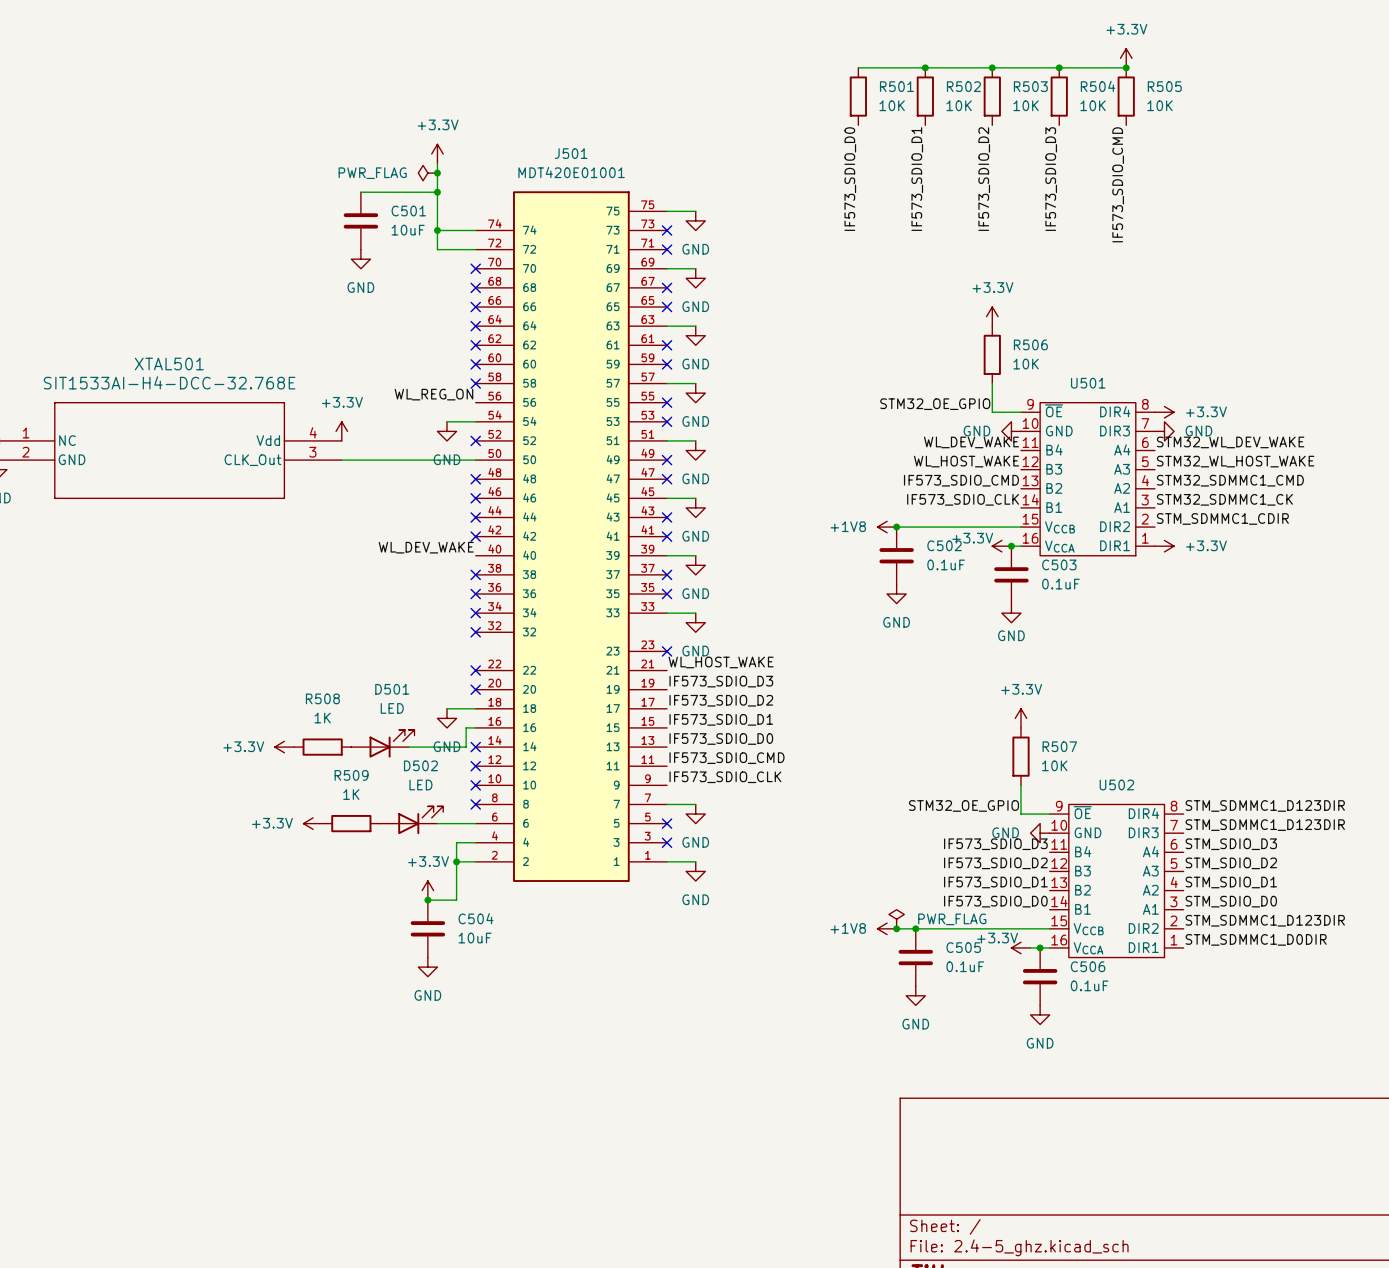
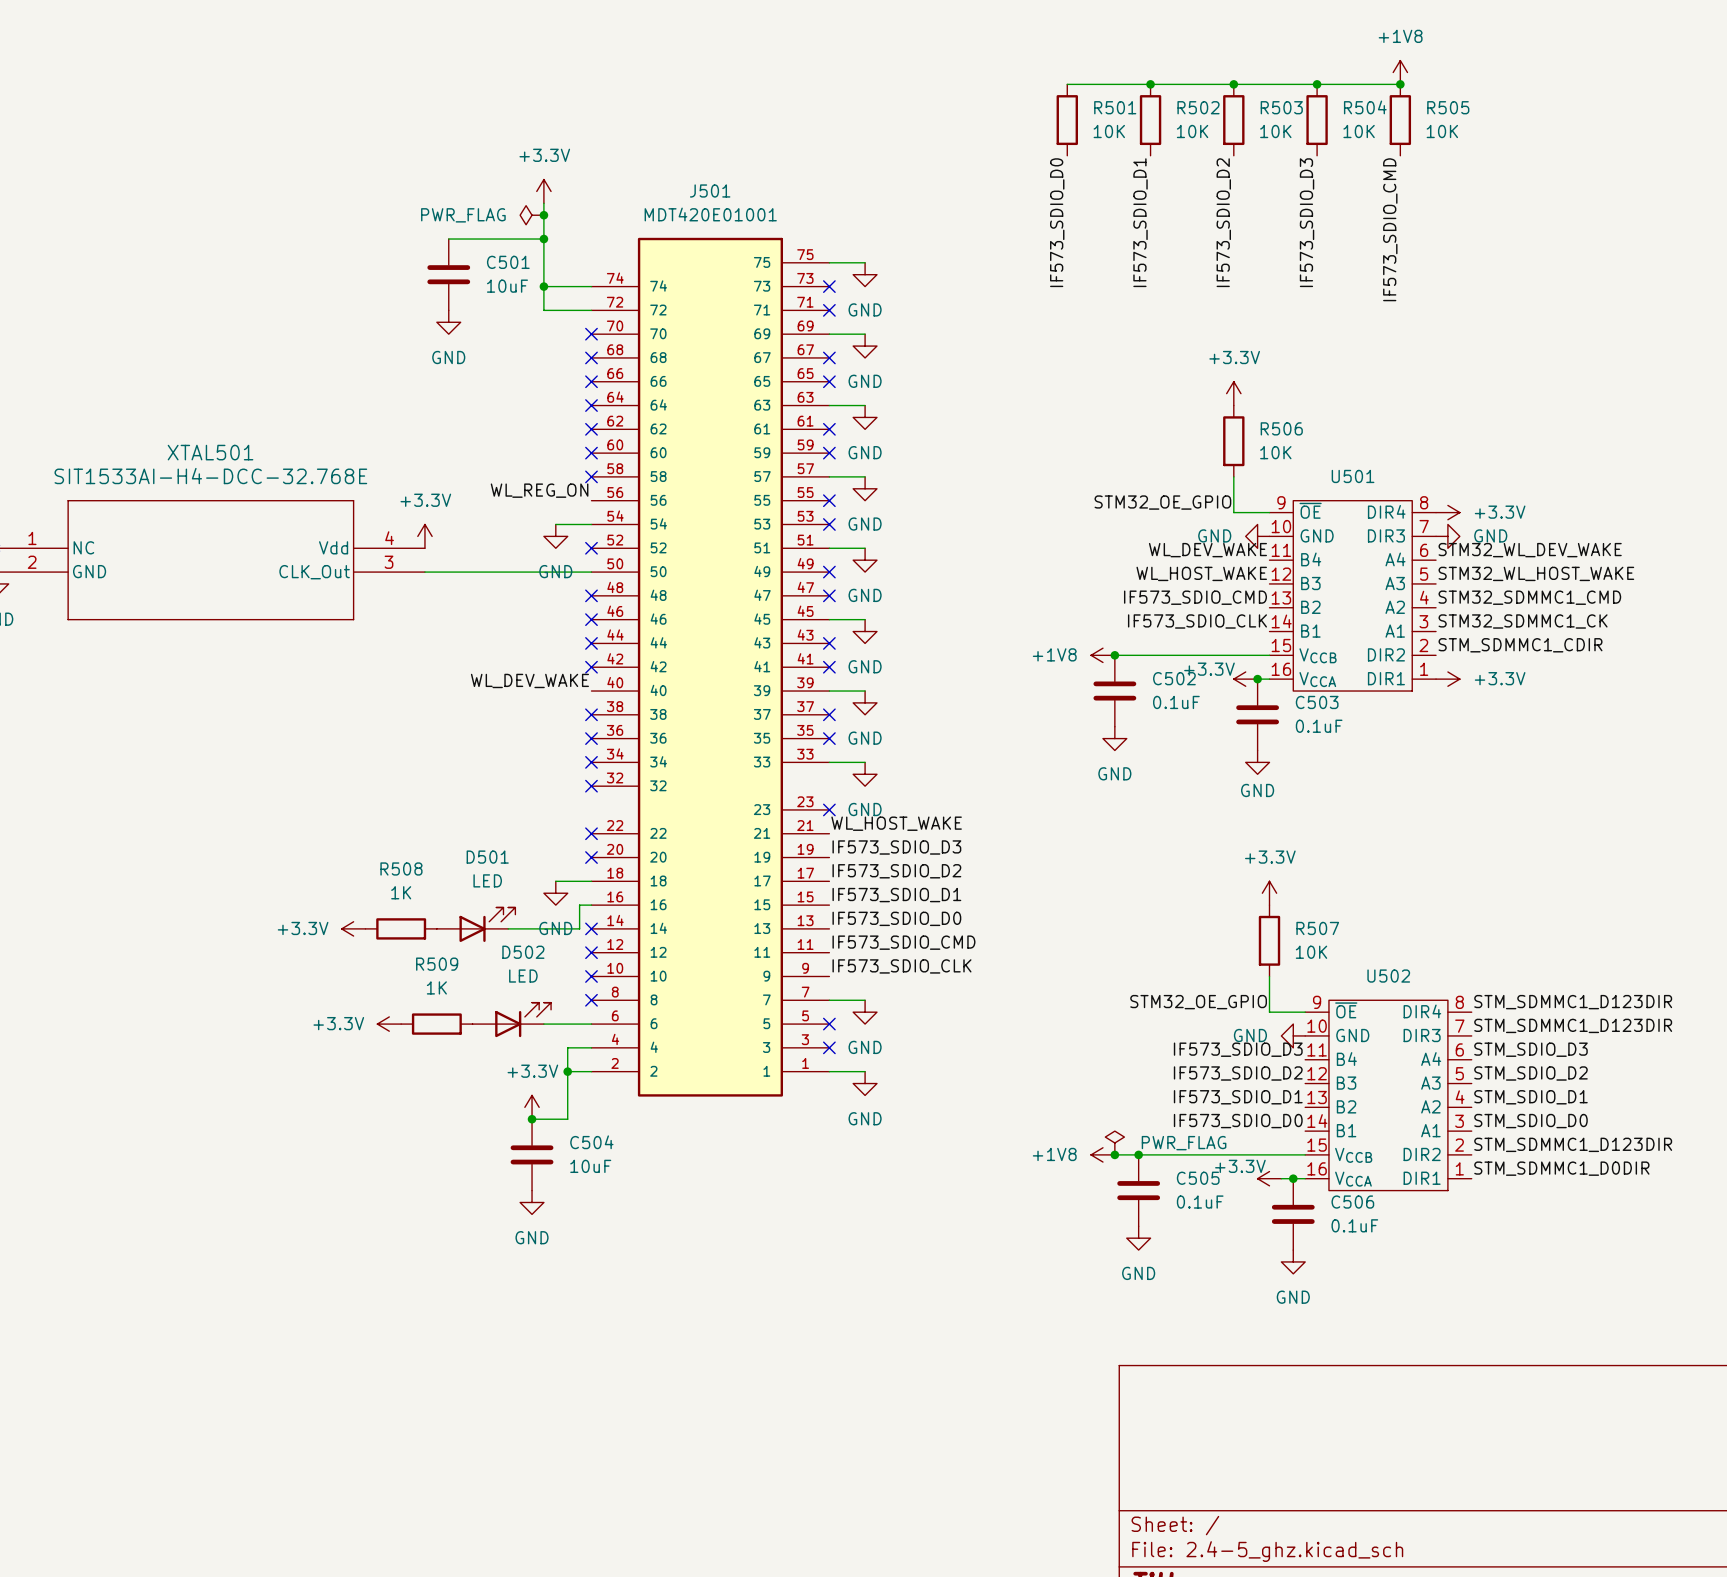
power symbol: +3.3V (1126, 58) -> +1V8 (1400, 72)

